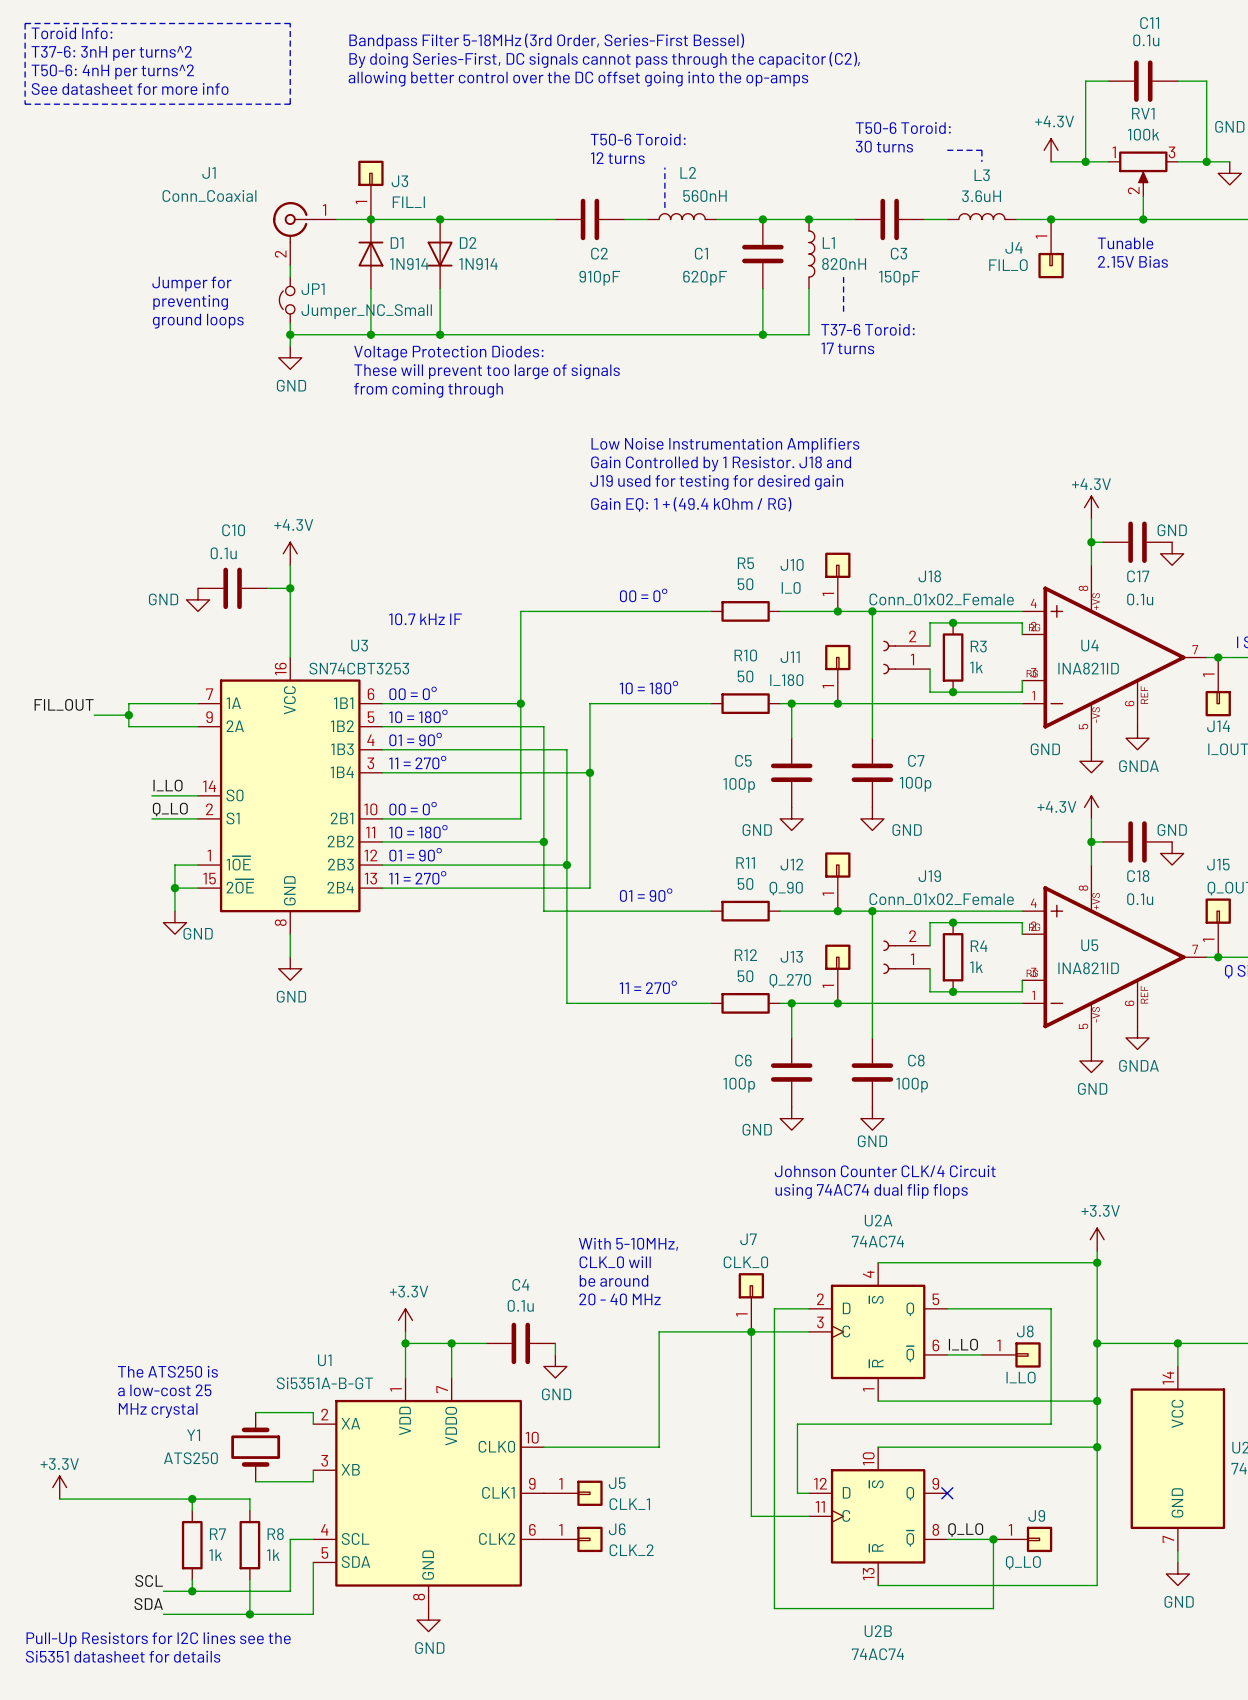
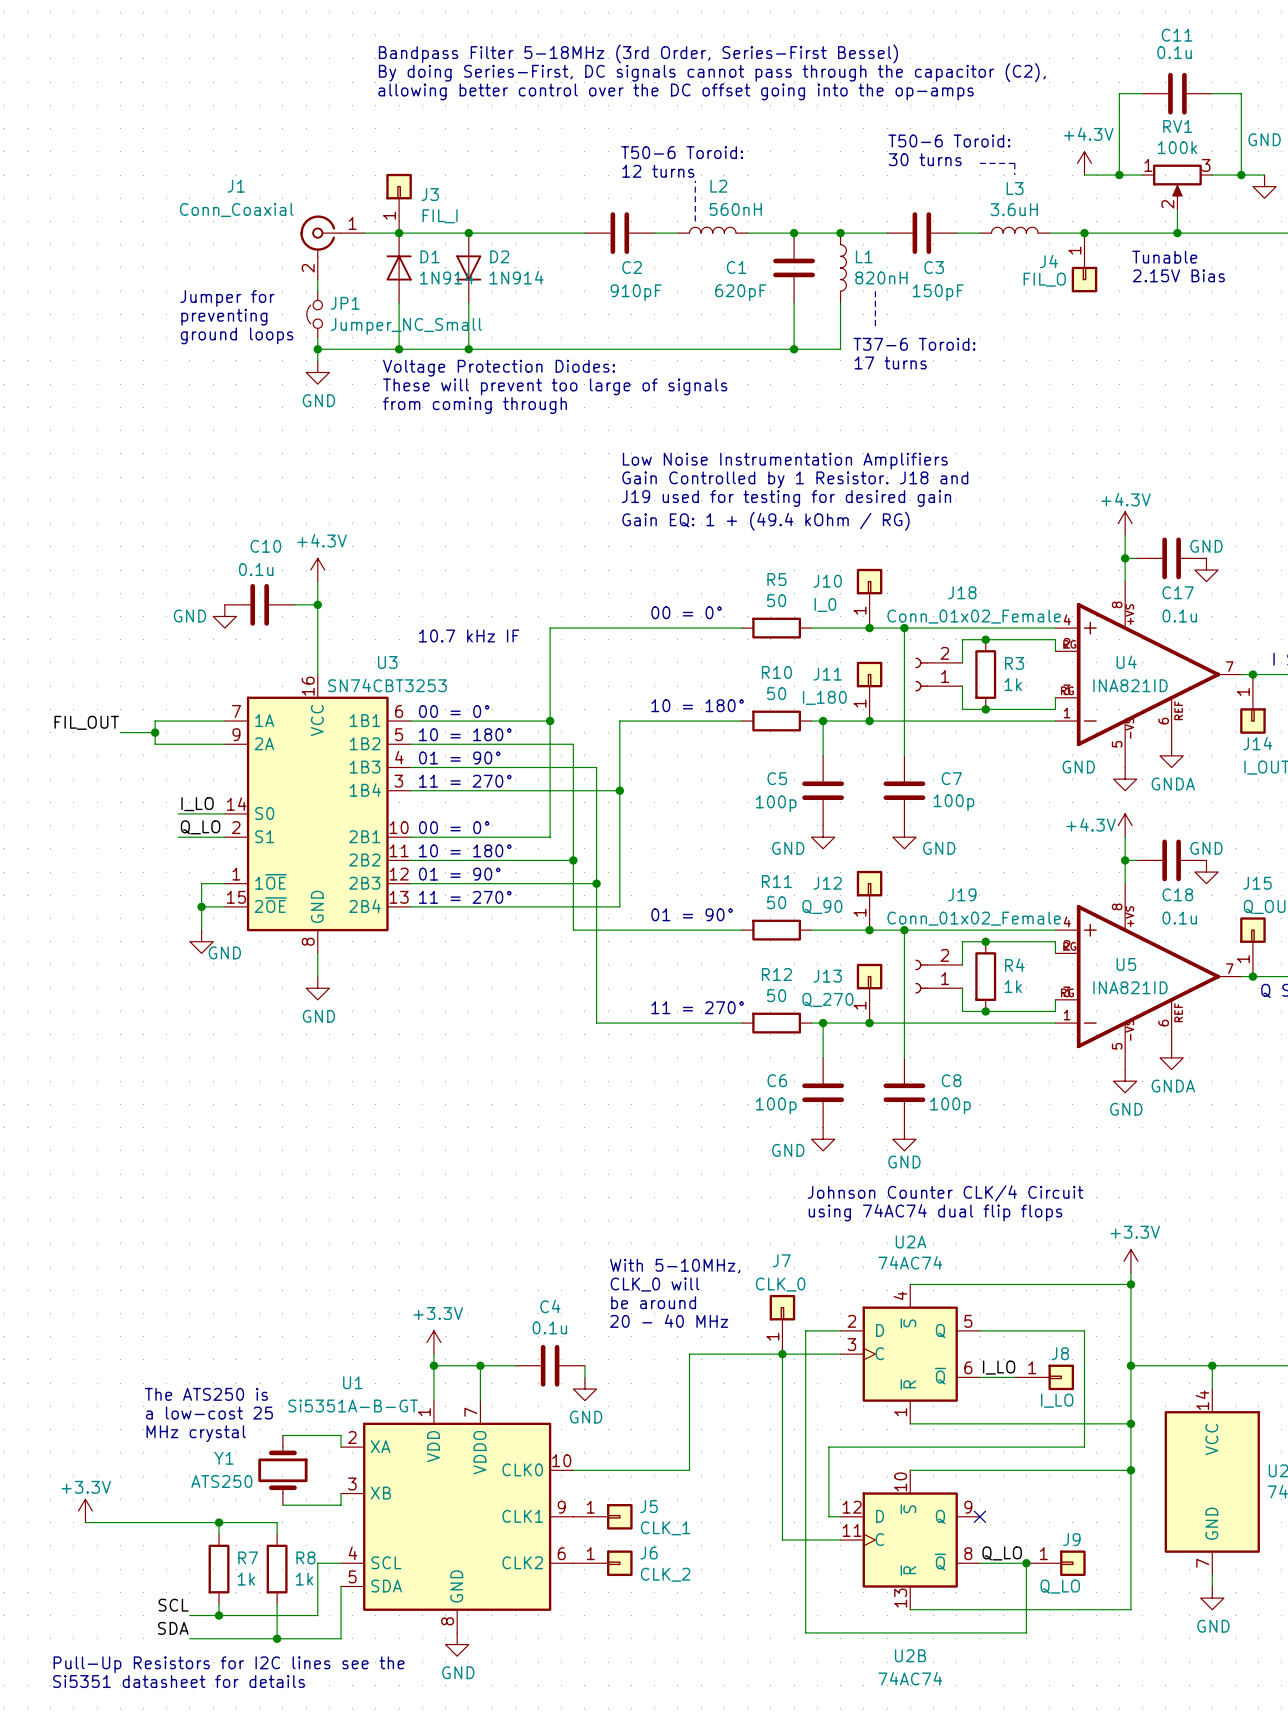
line: (25, 23) (25, 104) (290, 104) (290, 23) (25, 23) -> none
text: Toroid Info: (71, 33) -> none
text: T37-6: 3nH per turns^2 (111, 53) -> none
text: T50-6: 4nH per turns^2 (112, 71) -> none
text: See datasheet for more info (130, 88) -> none

